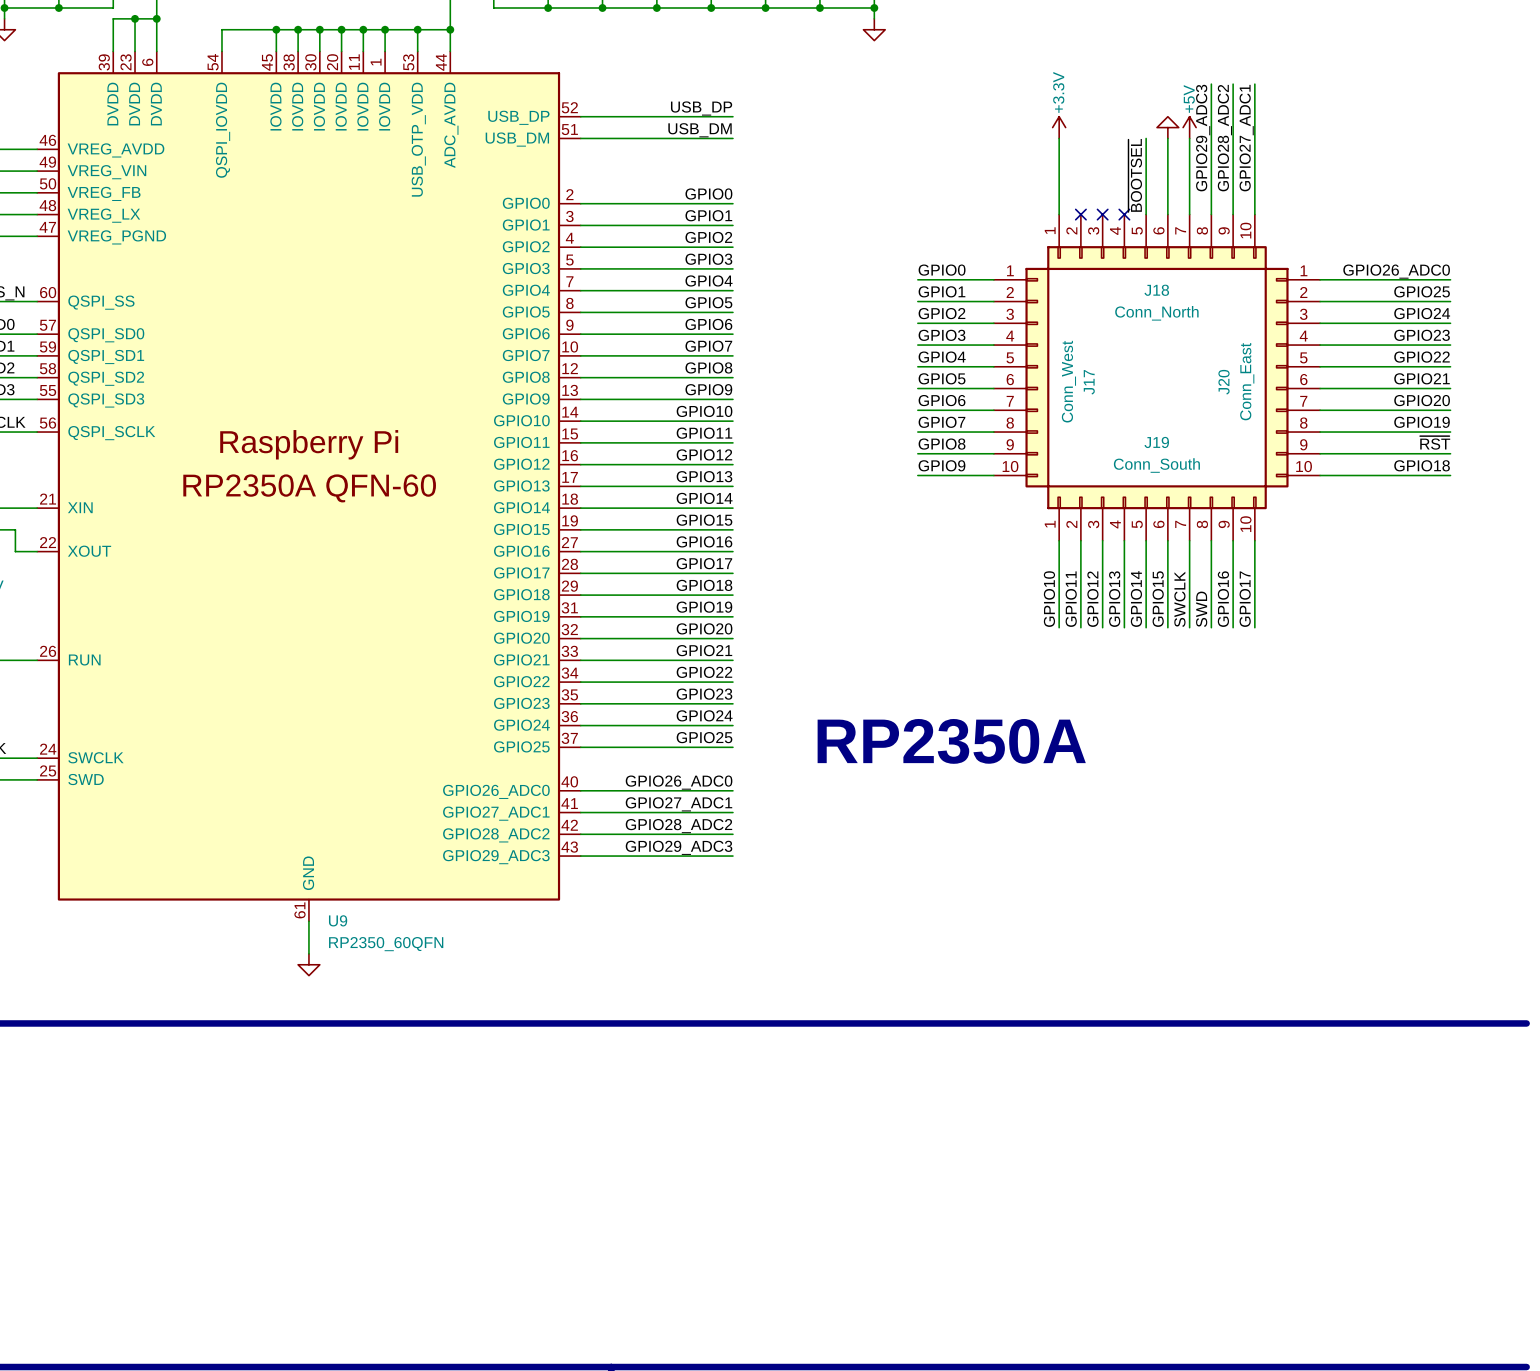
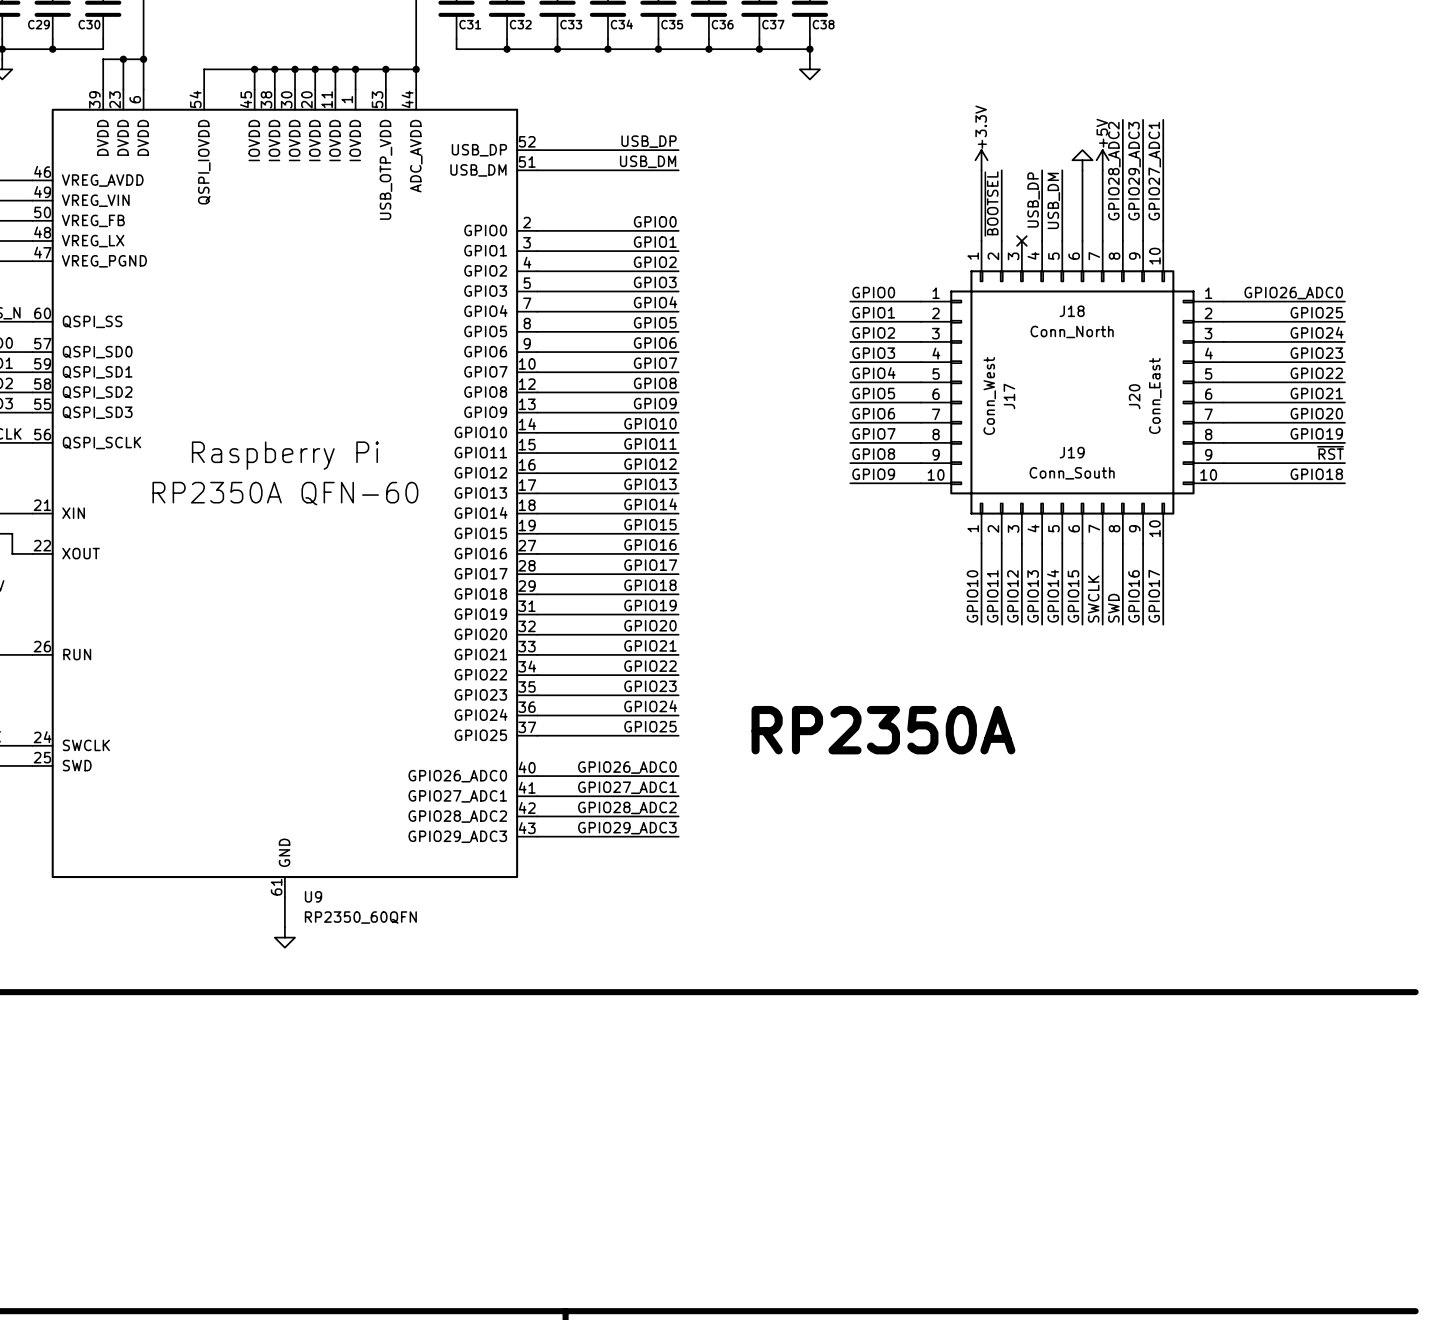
wire: none -> (1001, 170) (1001, 241)
wire: none -> (1042, 170) (1042, 241)
label: GPIO29_ADC3 (1203, 138) -> GPIO28_ADC2 (1114, 171)
label: GPIO28_ADC2 (1224, 138) -> GPIO29_ADC3 (1134, 171)
label: none -> USB_DP (1033, 199)
label: none -> ~{BOOTSEL} (991, 204)
label: ~{BOOTSEL} (1135, 175) -> USB_DM (1053, 200)
no-connect mark: (1080, 214) -> none
no-connect mark: (1124, 214) -> none

